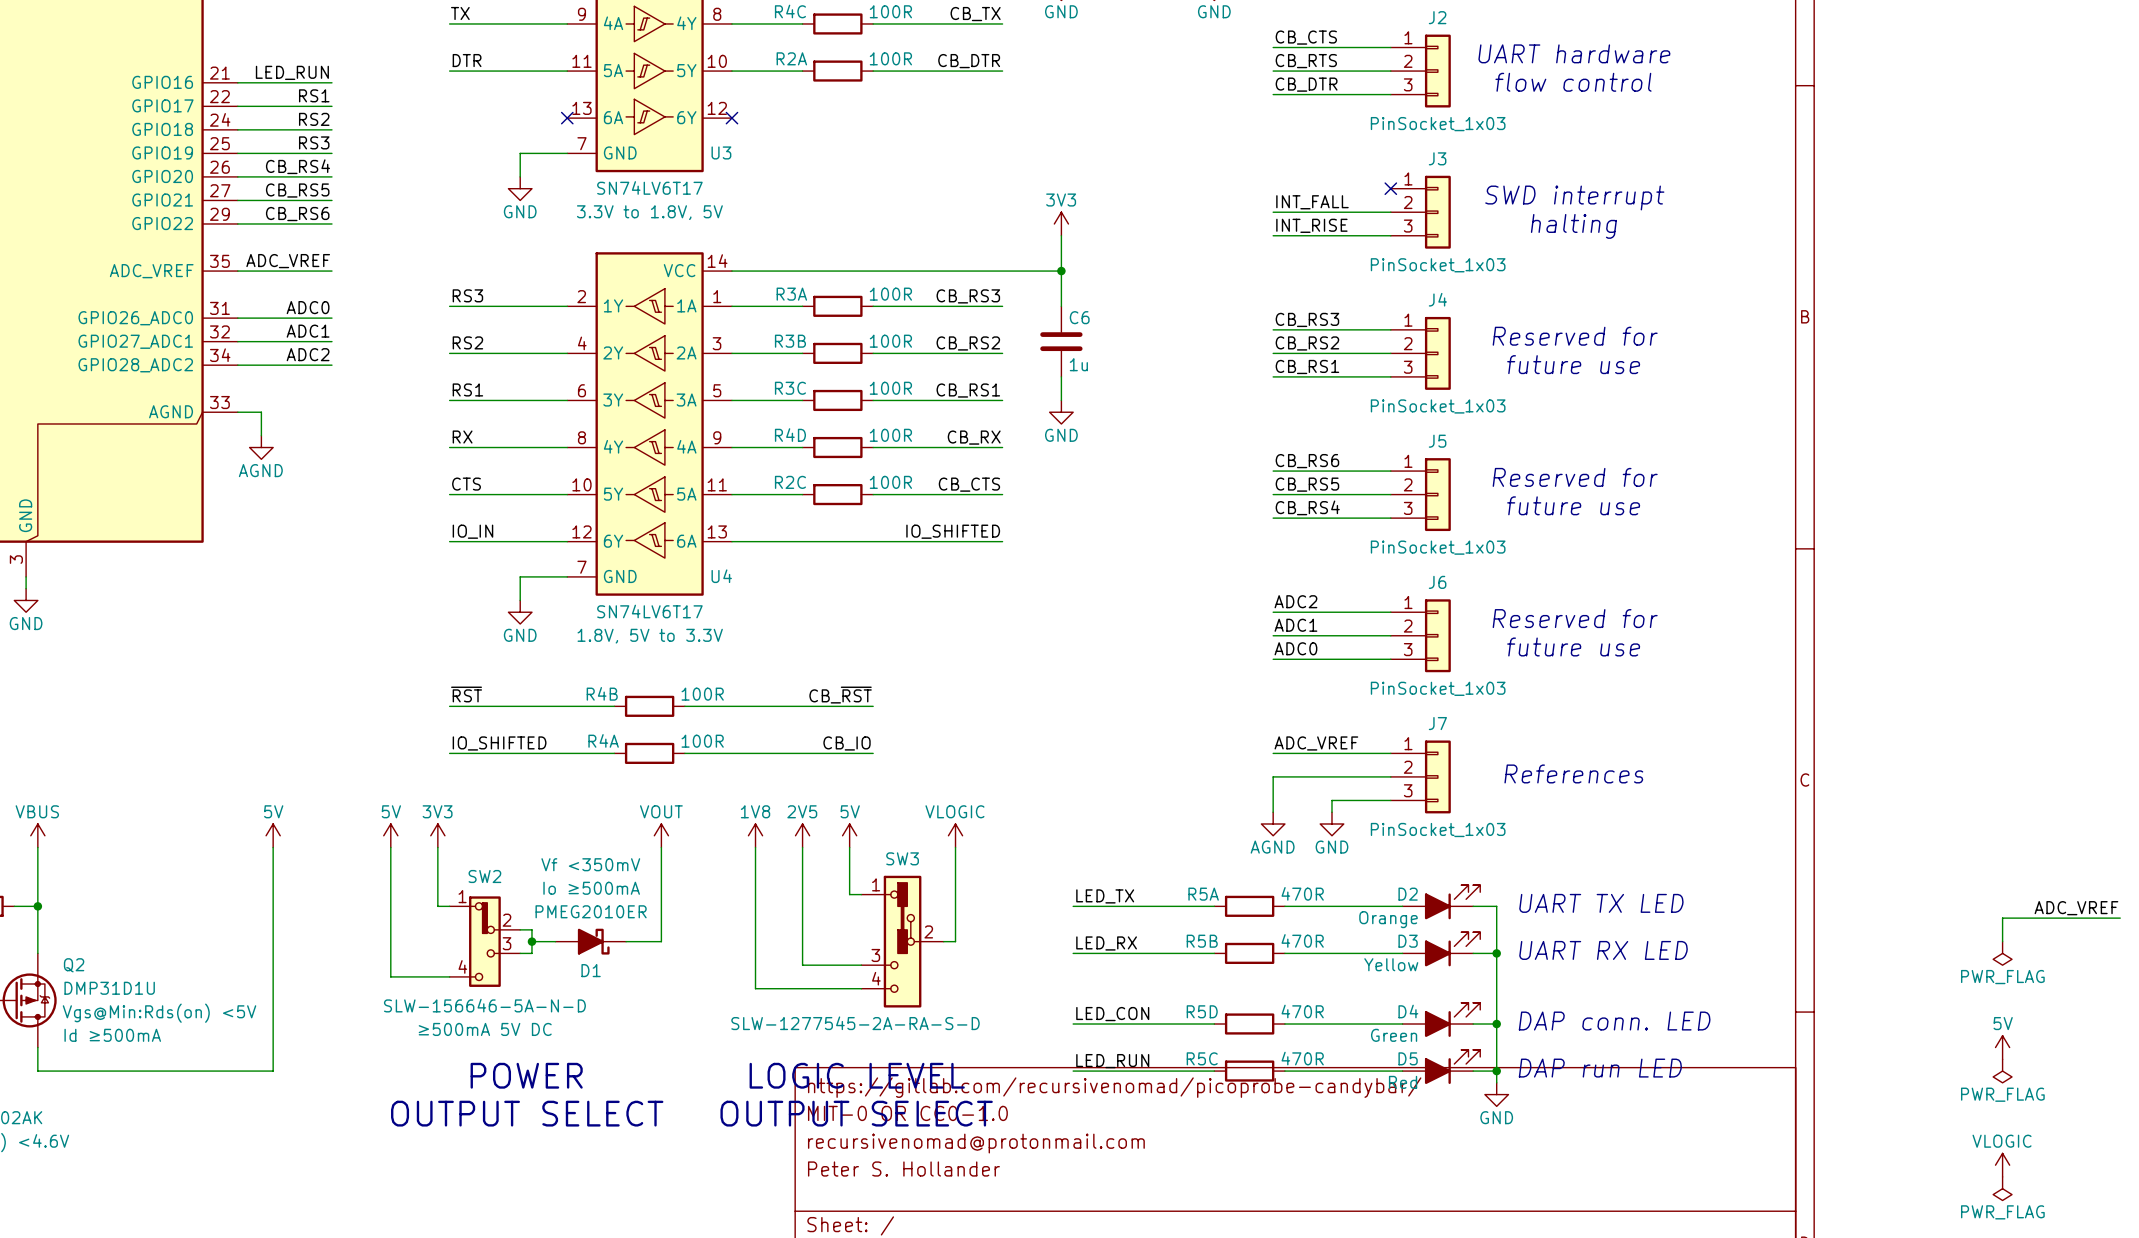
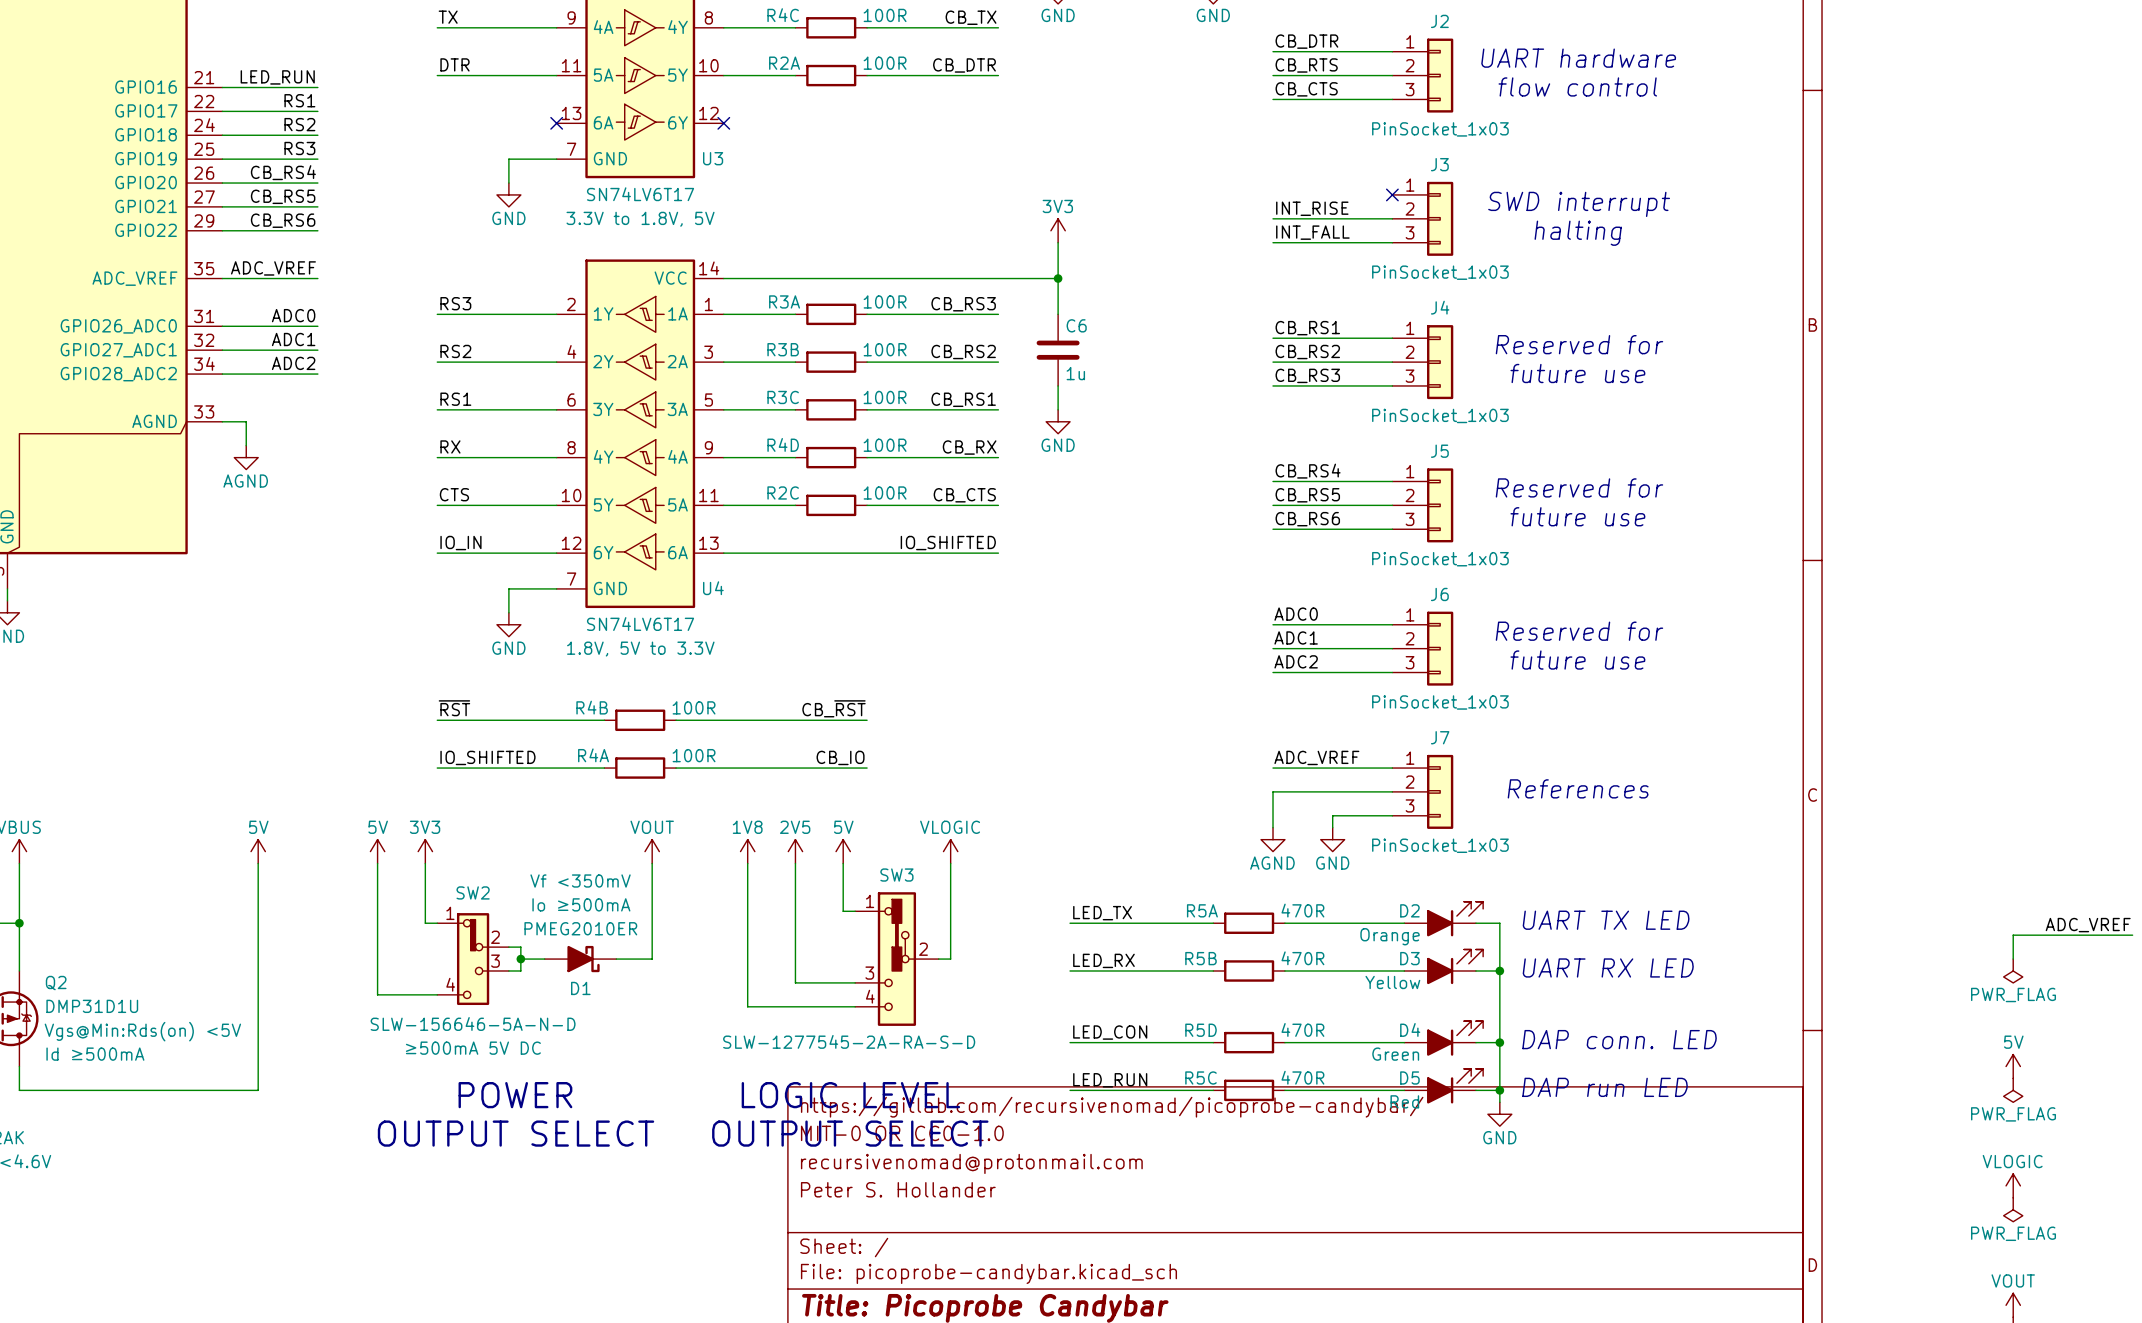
label: CB_CTS (1306, 37) -> CB_DTR (1306, 41)
label: CB_DTR (1306, 84) -> CB_CTS (1306, 89)
label: INT_FALL (1312, 202) -> INT_RISE (1312, 208)
label: INT_RISE (1311, 225) -> INT_FALL (1312, 232)
label: CB_RS3 (1307, 319) -> CB_RS1 (1307, 328)
label: CB_RS1 (1307, 366) -> CB_RS3 (1307, 375)
label: CB_RS6 (1307, 461) -> CB_RS4 (1308, 471)
label: CB_RS4 (1307, 507) -> CB_RS6 (1307, 519)
label: ADC2 (1295, 601) -> ADC0 (1296, 614)
label: ADC0 (1295, 648) -> ADC2 (1296, 661)

